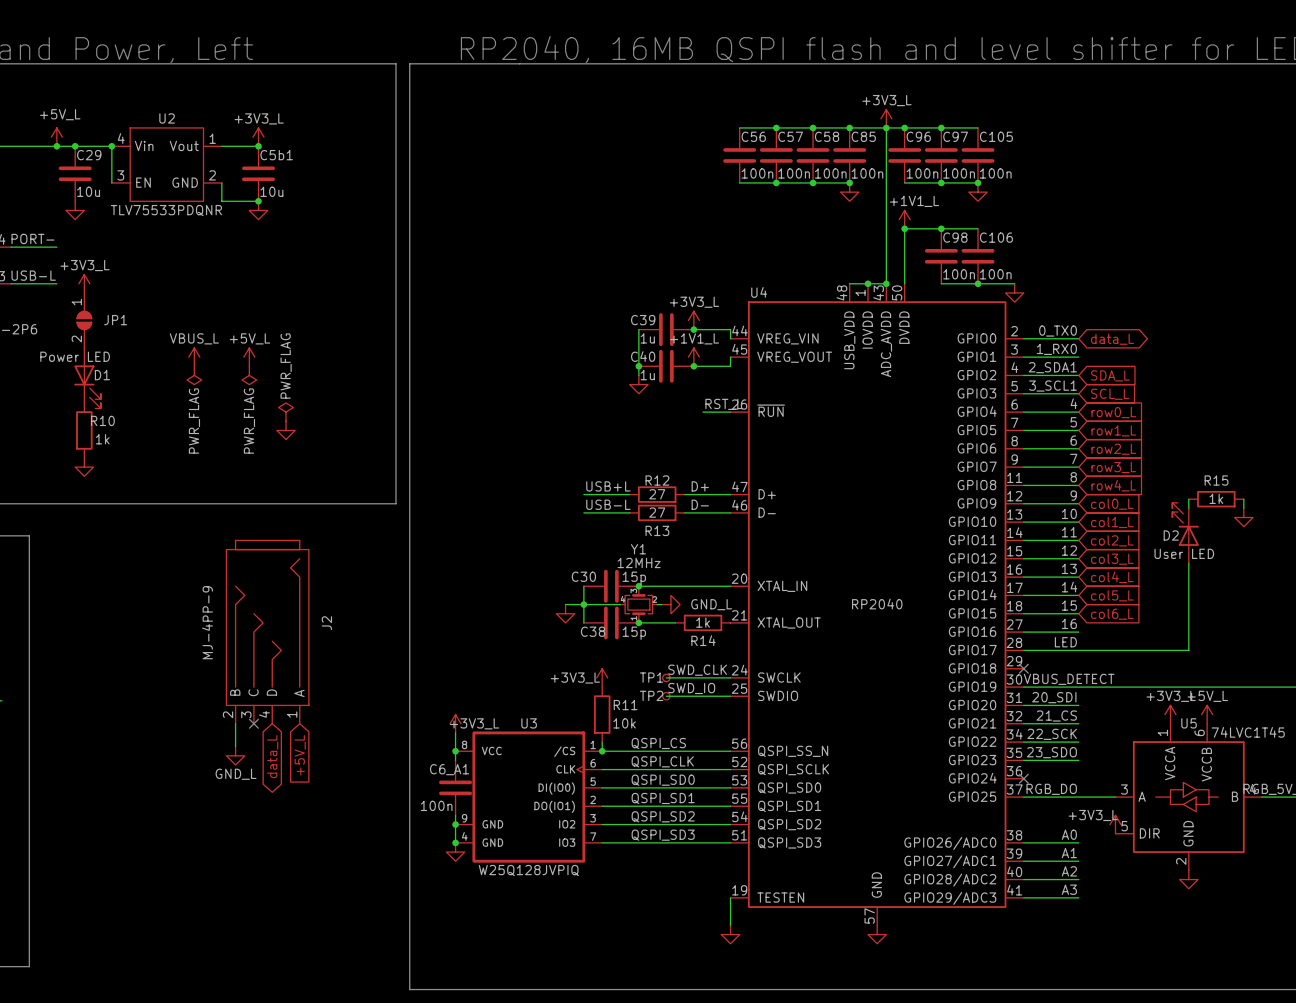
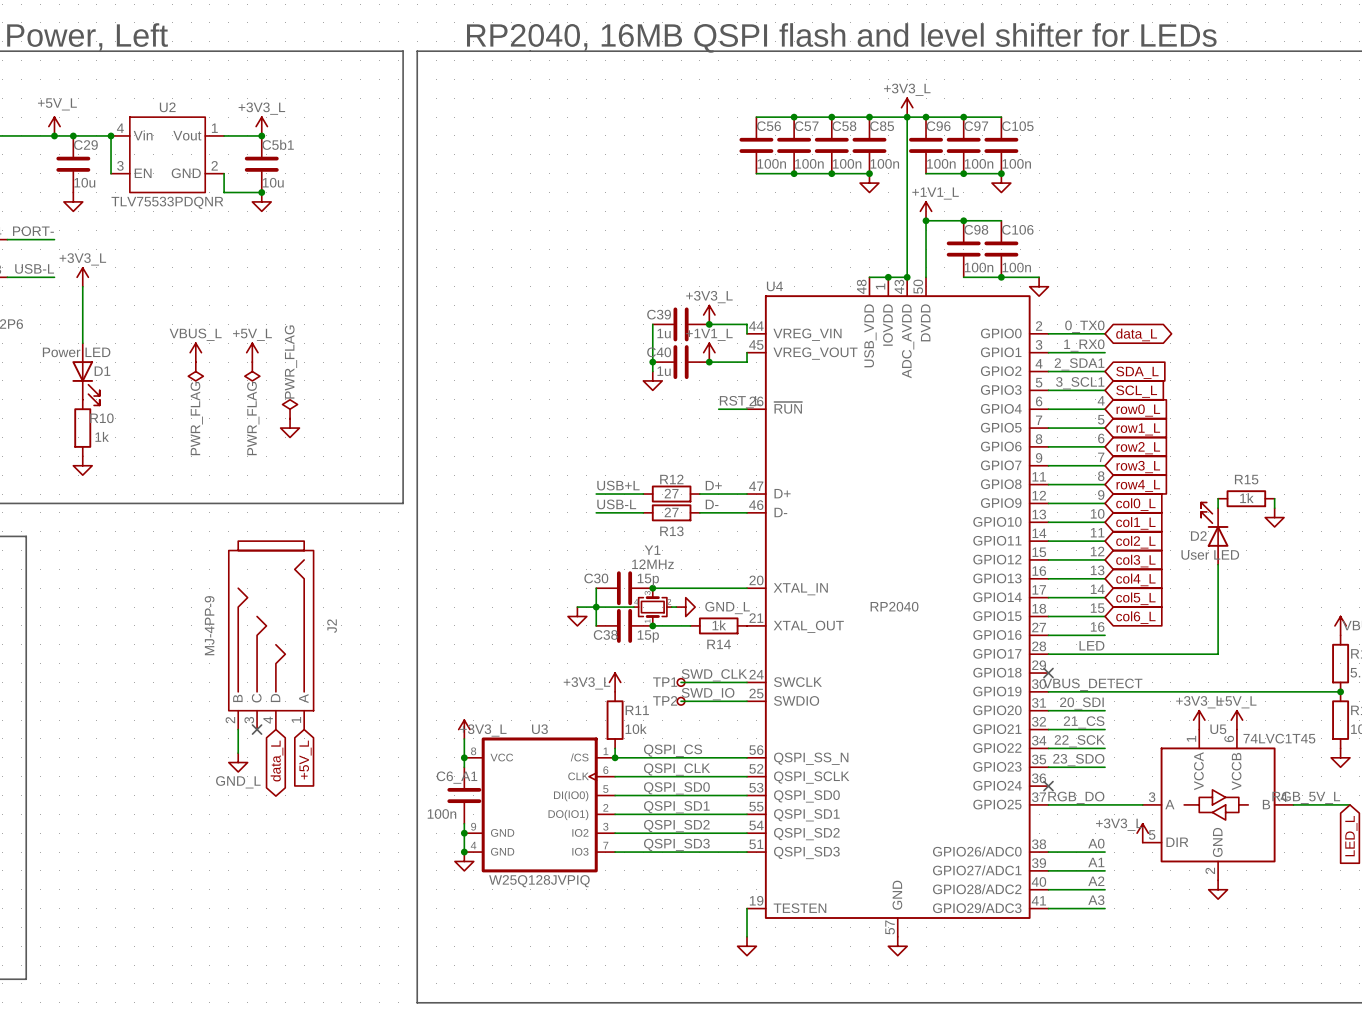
JP1: (84, 320) -> none

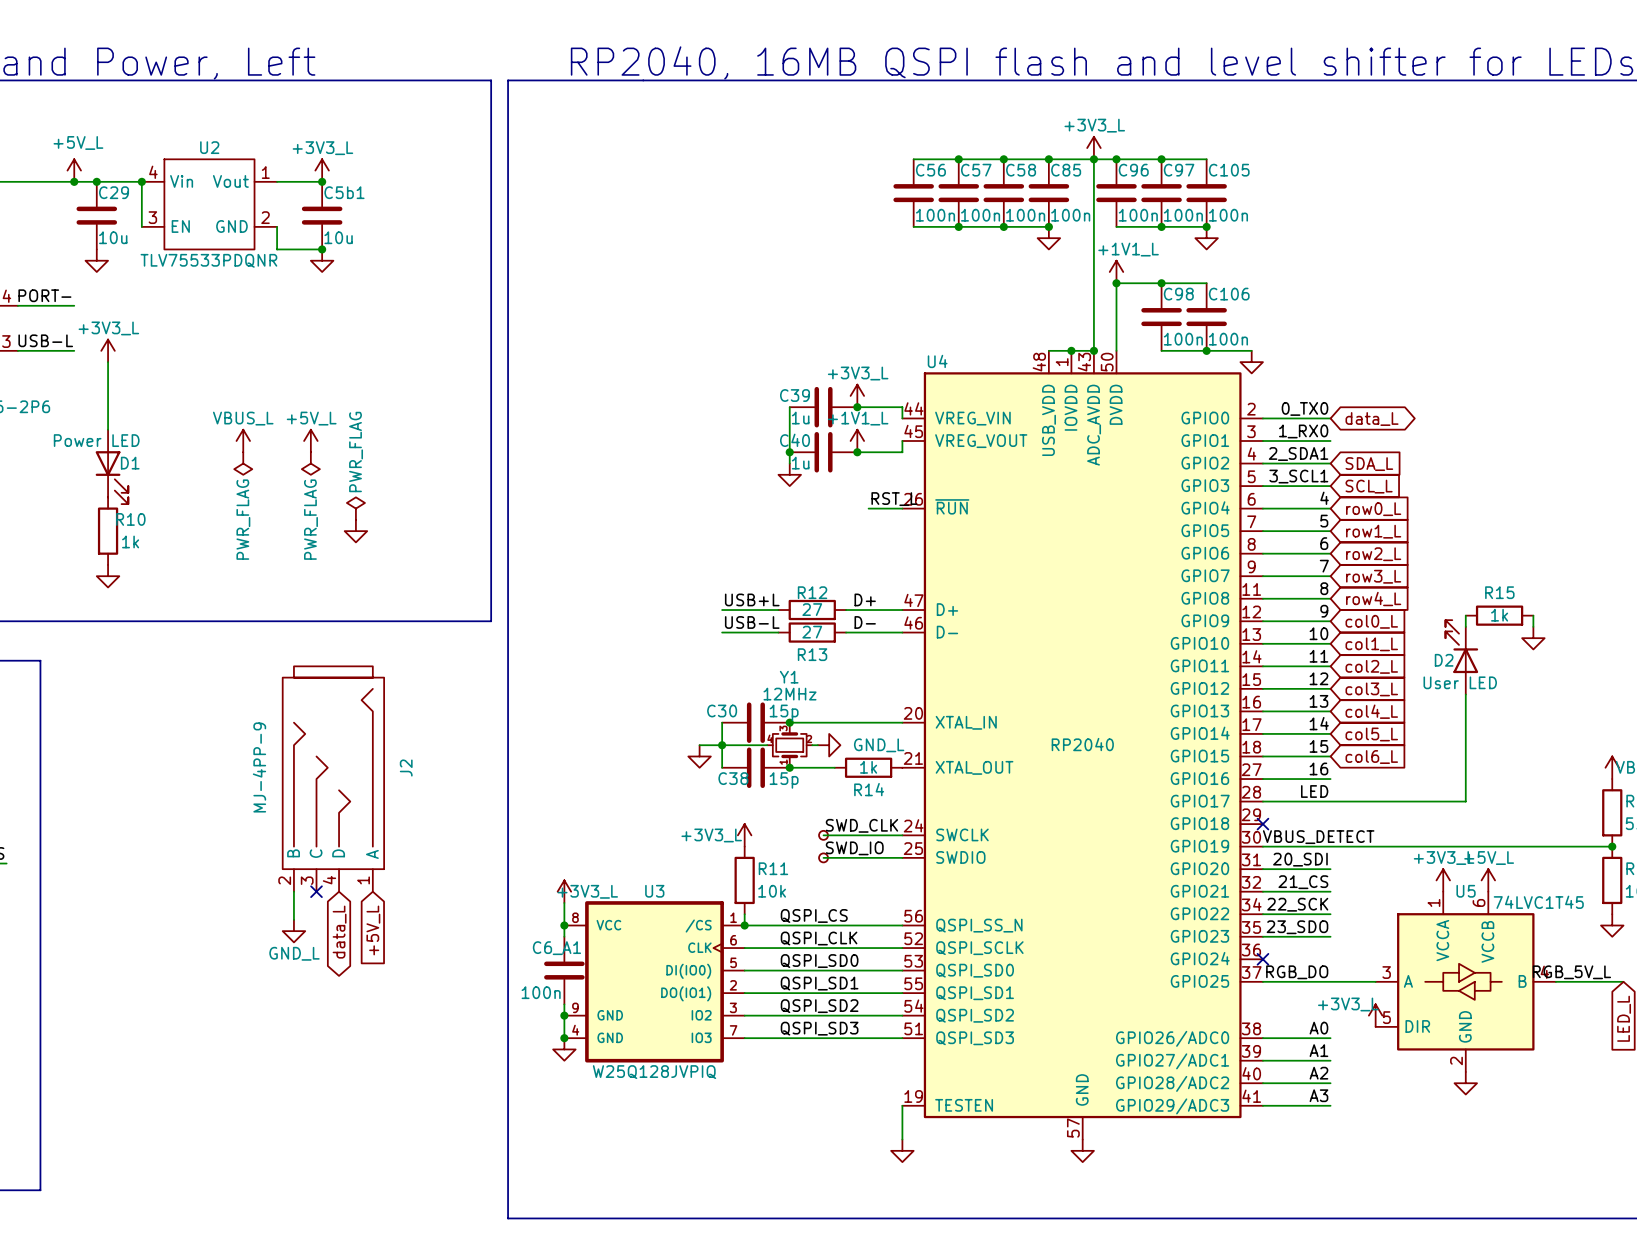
TP1 name: TP1 (665, 682) -> none
TP2 name: TP2 (665, 700) -> none

